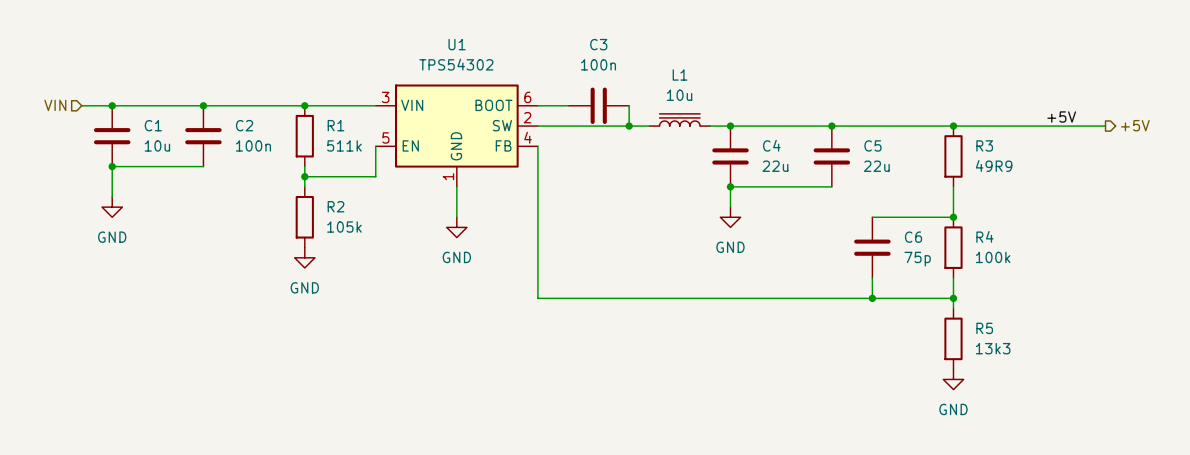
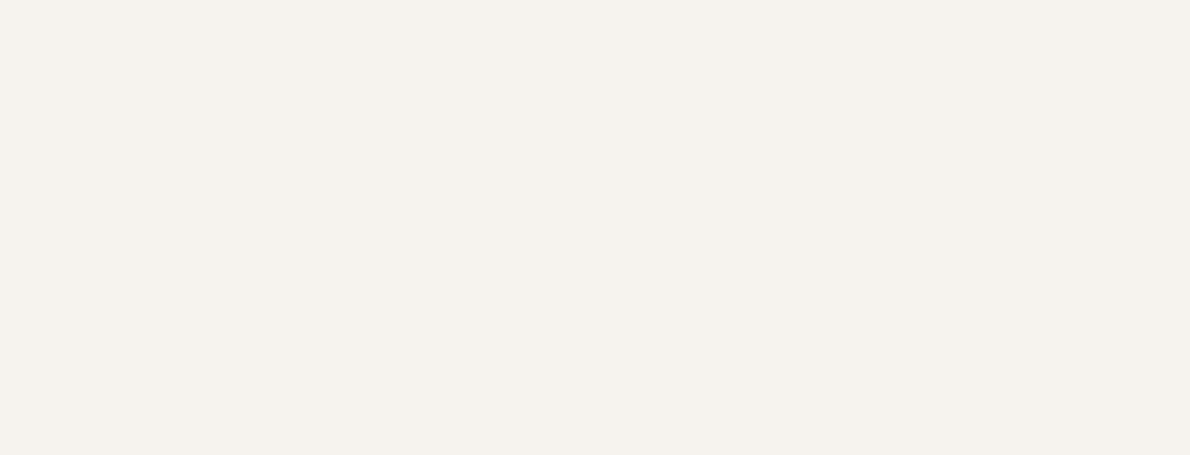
hierarchical label: VIN (55, 105) -> none
wire: (81, 105) (375, 105) -> none
junction: (112, 105) -> none
junction: (203, 105) -> none
junction: (304, 105) -> none
wire: (537, 105) (568, 105) -> none
C3: 100n (598, 105) -> none
wire: (629, 105) (629, 126) -> none
label: +5V (1061, 117) -> none
L1: 10u (679, 119) -> none
hierarchical label: +5V (1135, 125) -> none
wire: (537, 126) (649, 126) -> none
junction: (629, 126) -> none
wire: (710, 126) (1105, 126) -> none
junction: (730, 126) -> none
junction: (831, 126) -> none
junction: (953, 126) -> none
U1: TPS54302 (456, 135) -> none
C1: 10u (112, 136) -> none
C2: 100n (203, 136) -> none
R1: 511k (304, 136) -> none
wire: (375, 146) (375, 176) (304, 176) -> none
wire: (537, 146) (537, 298) (953, 298) -> none
C4: 22u (730, 156) -> none
C5: 22u (831, 156) -> none
R3: 49R9 (953, 156) -> none
junction: (112, 166) -> none
wire: (203, 166) (112, 166) (112, 197) -> none
wire: (304, 166) (304, 186) -> none
junction: (304, 176) -> none
wire: (456, 186) (456, 217) -> none
junction: (730, 186) -> none
wire: (831, 186) (730, 186) (730, 207) -> none
wire: (953, 186) (953, 217) (872, 217) -> none
power symbol: GND (112, 207) -> none
R2: 105k (304, 217) -> none
power symbol: GND (730, 217) -> none
junction: (953, 217) -> none
power symbol: GND (456, 227) -> none
C6: 75p (872, 247) -> none
R4: 100k (953, 247) -> none
power symbol: GND (304, 257) -> none
wire: (872, 278) (872, 298) -> none
wire: (953, 278) (953, 308) -> none
junction: (872, 298) -> none
junction: (953, 298) -> none
R5: 13k3 (953, 338) -> none
power symbol: GND (953, 379) -> none

